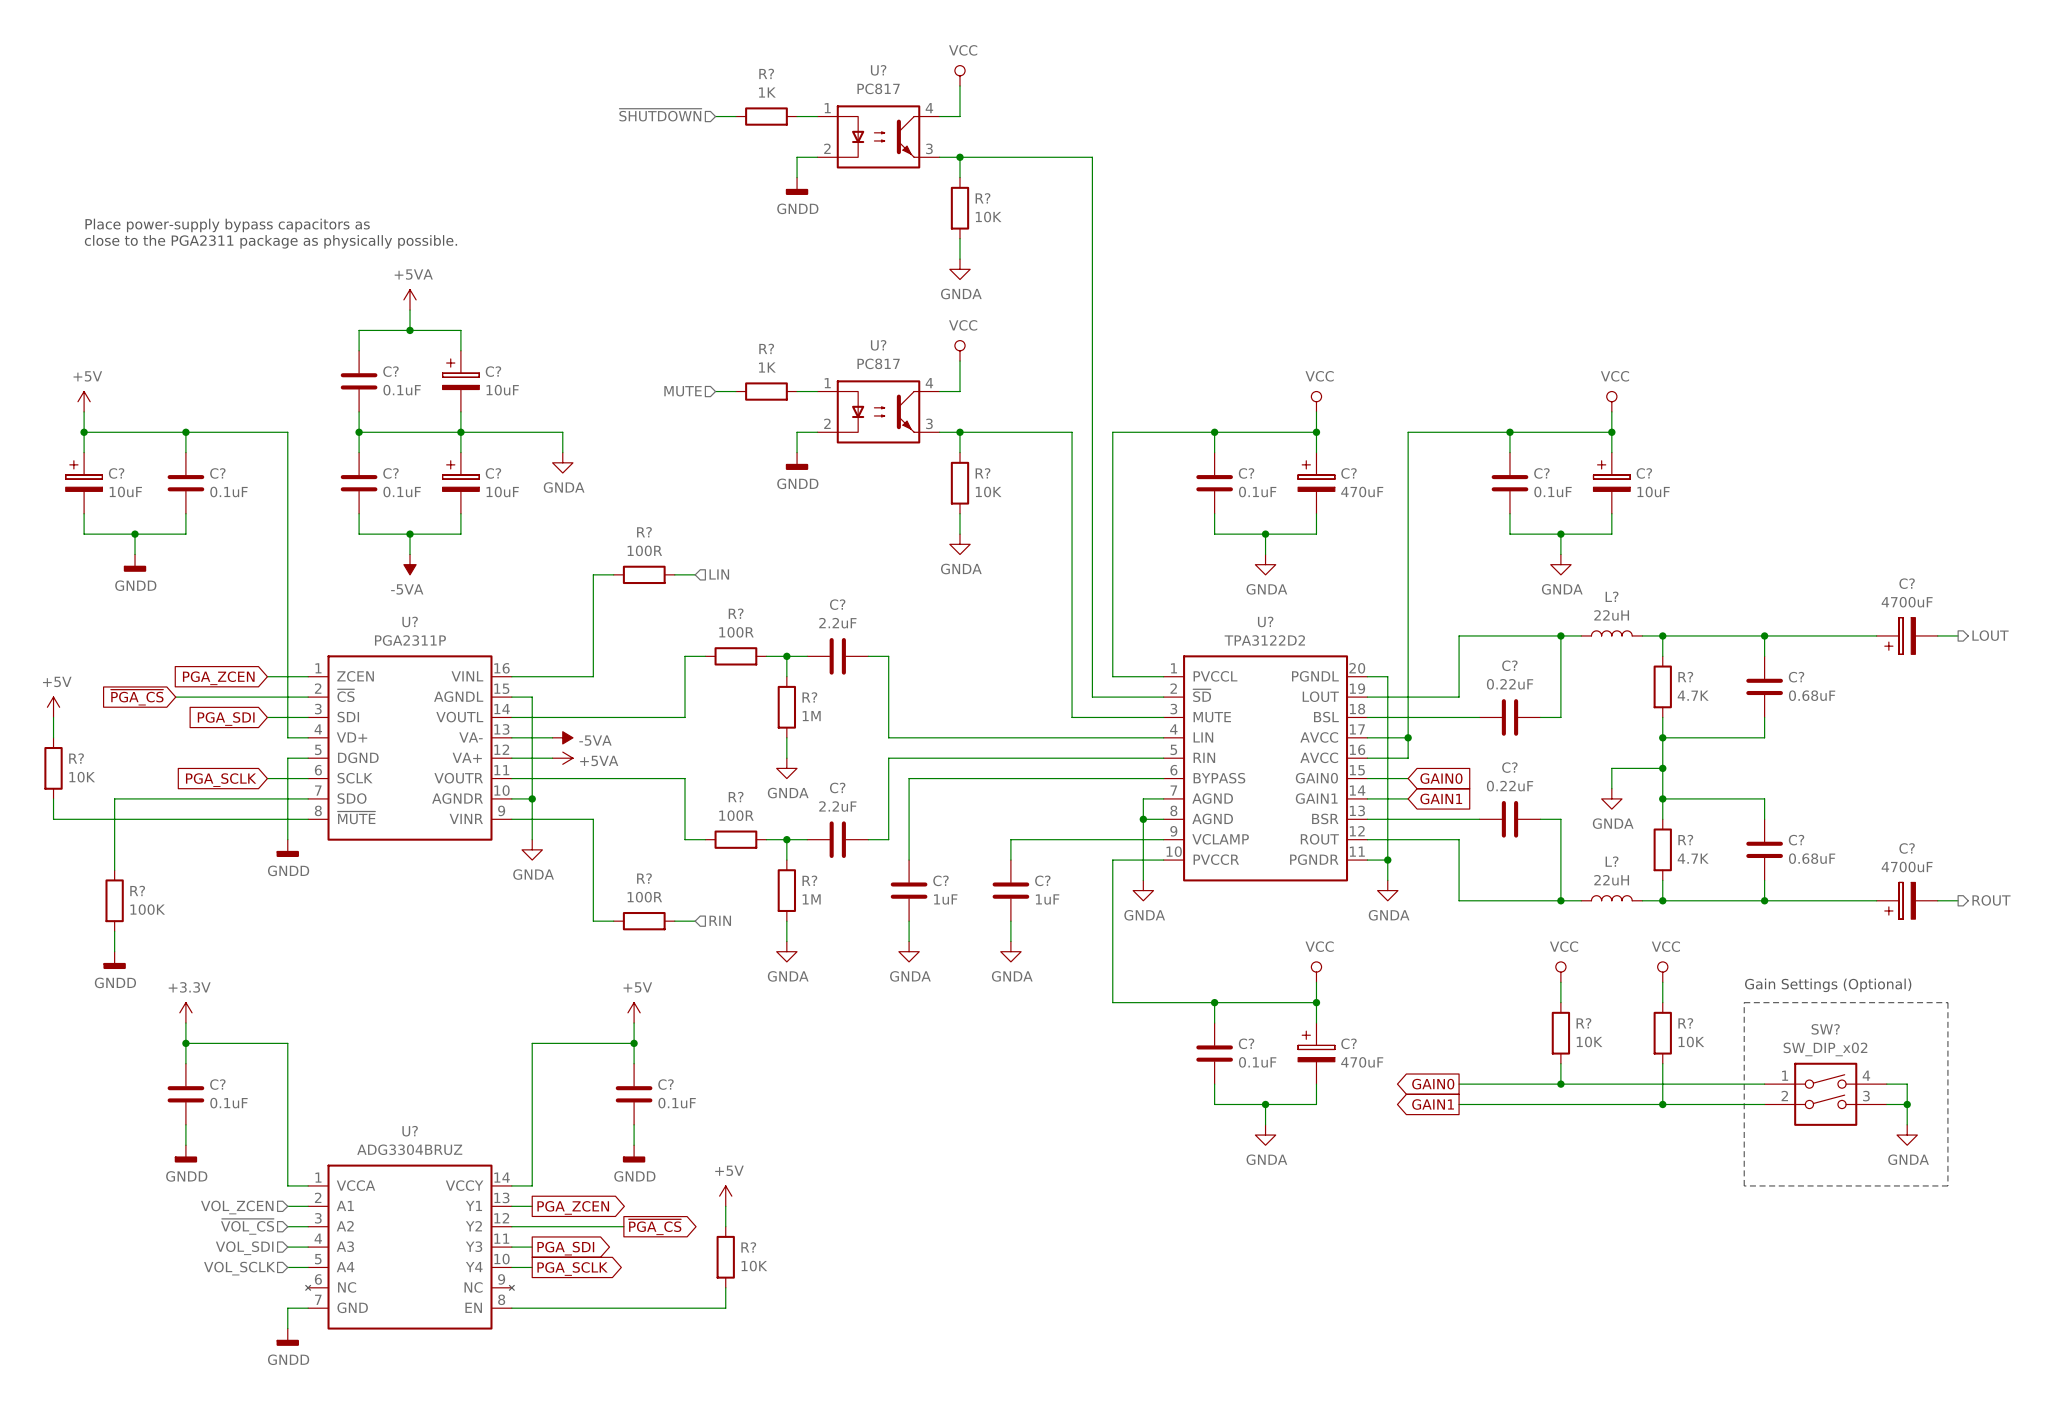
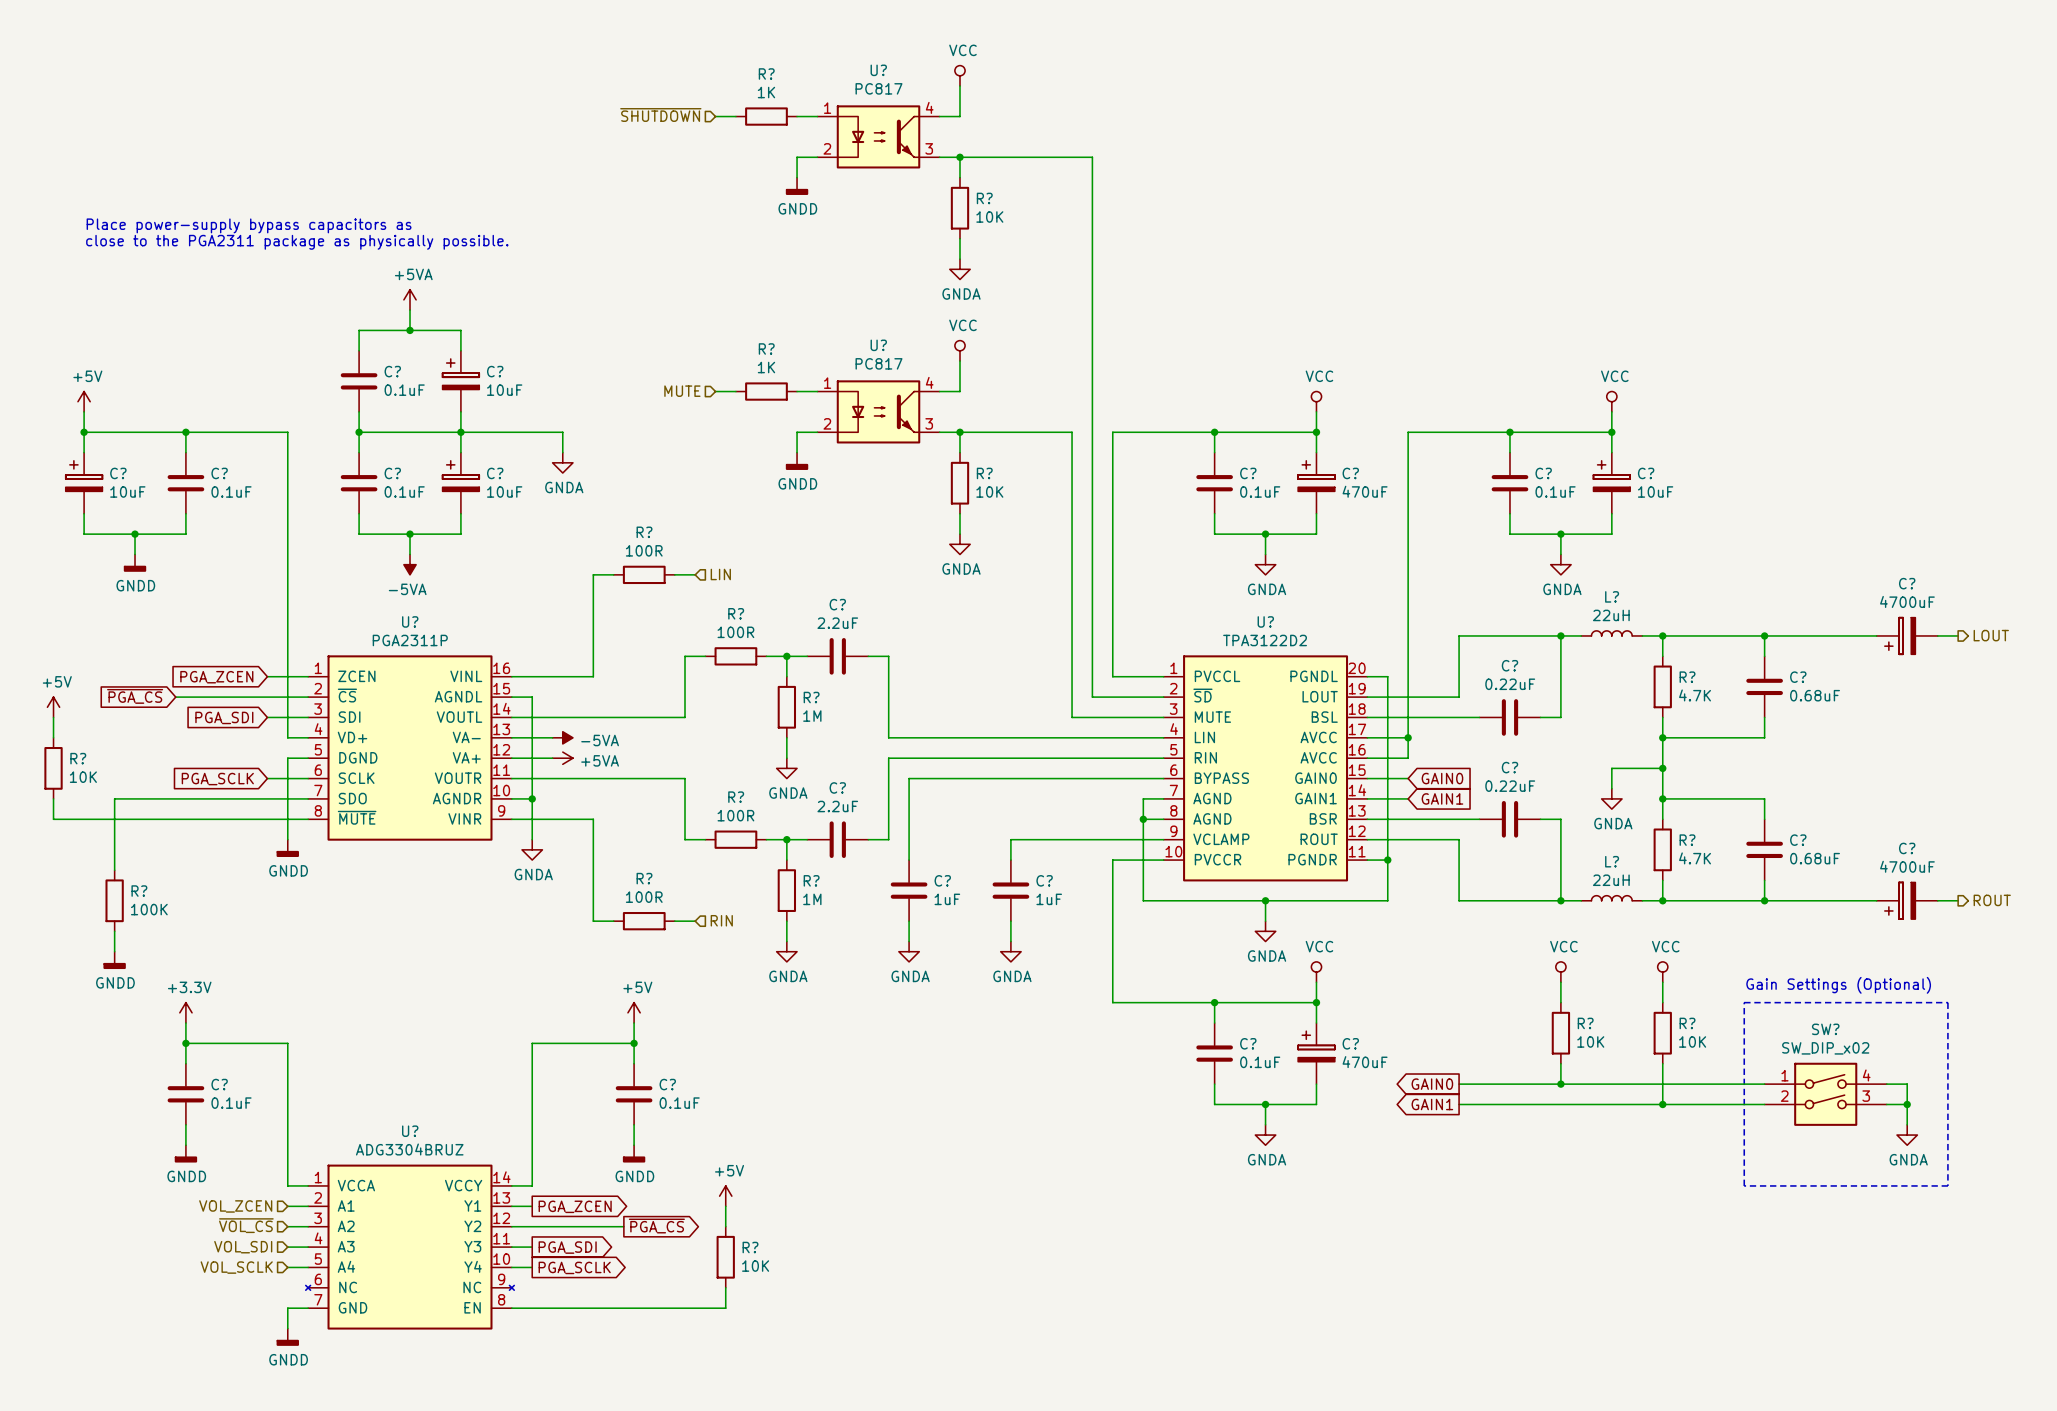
wire: none -> (1143, 880) (1143, 900) (1387, 900) (1387, 880)
power symbol: GNDA (1143, 890) -> none
power symbol: GNDA (1387, 890) -> none
wire: none -> (1265, 900) (1265, 921)
junction: none -> (1265, 900)
power symbol: none -> GNDA (1265, 931)

